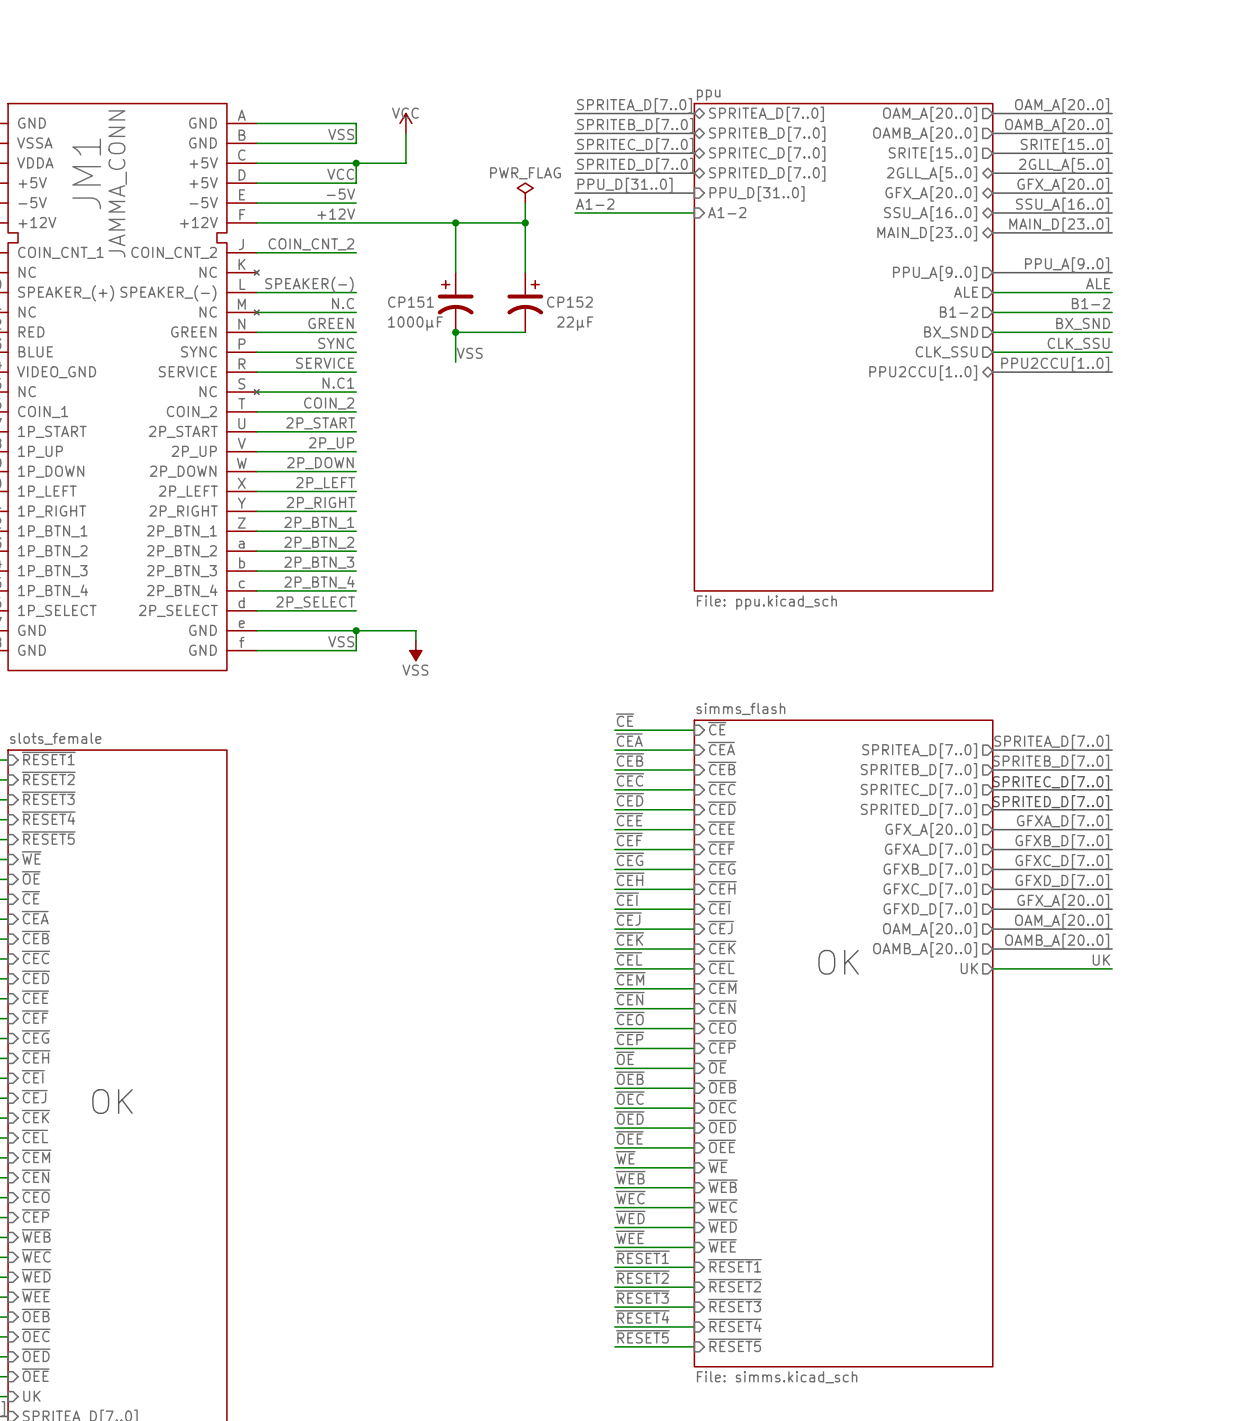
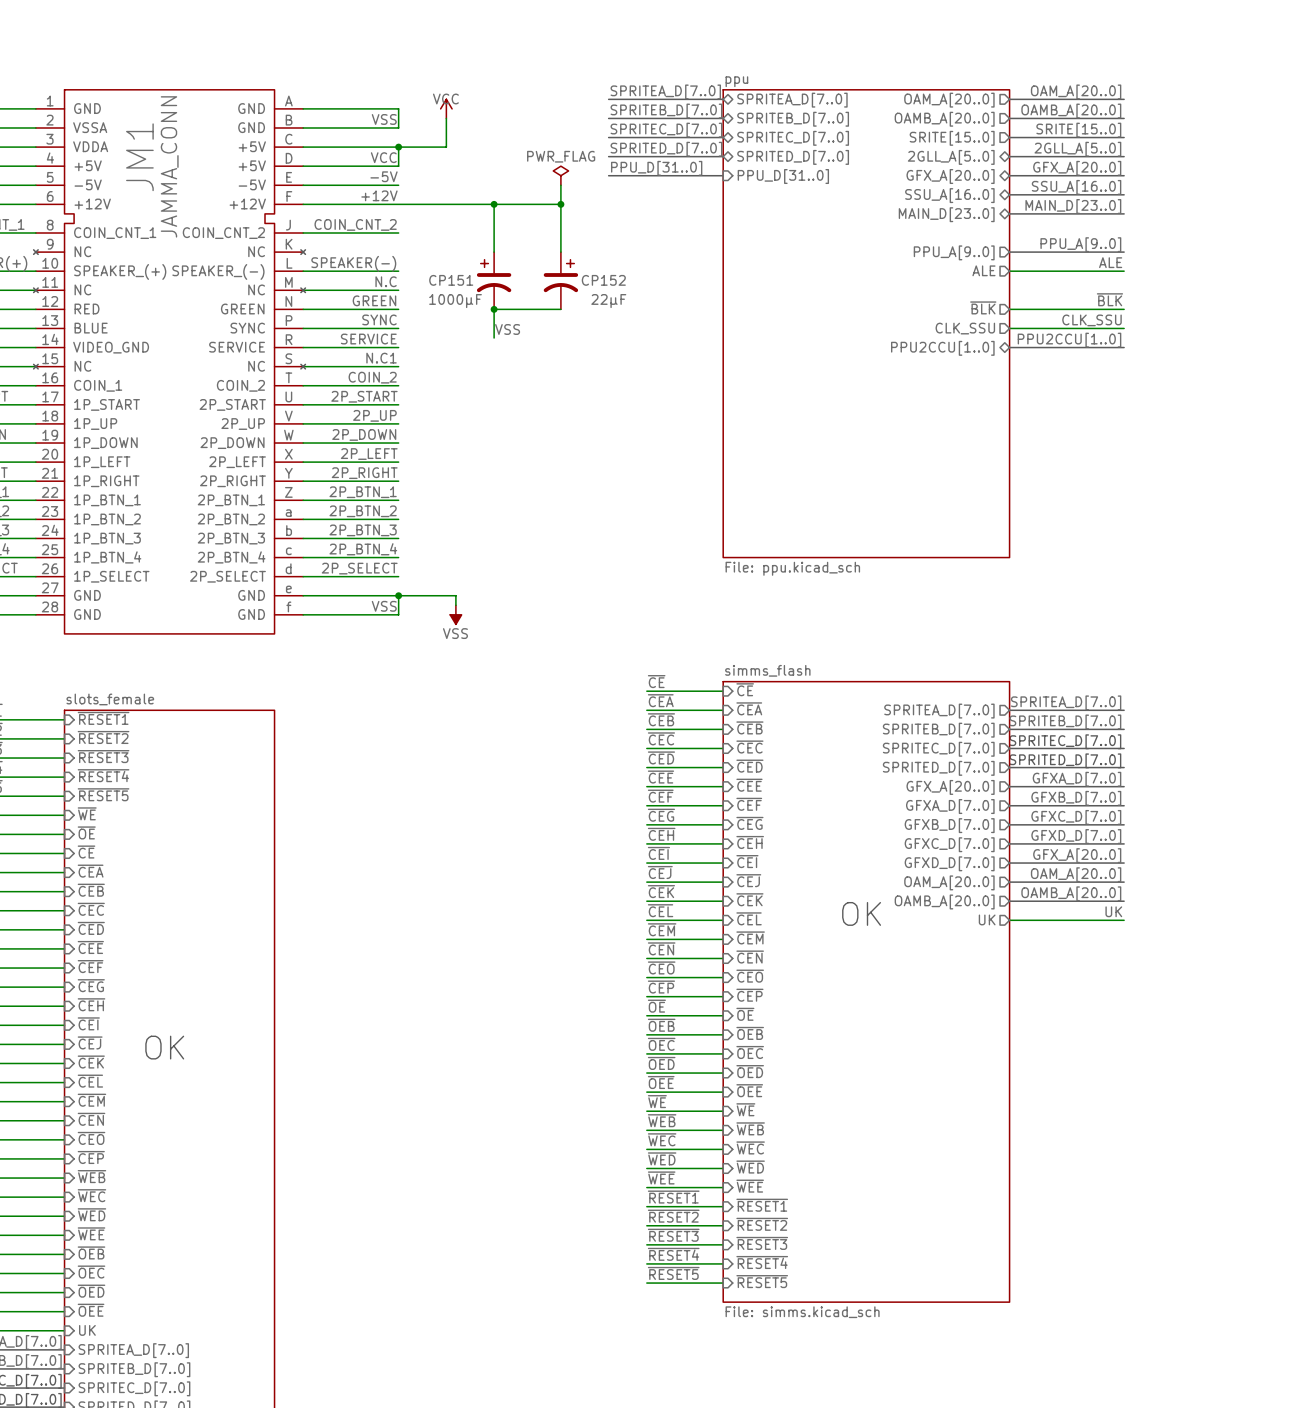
label: A1-2 (595, 204) -> none
wire: (575, 212) (694, 212) -> none
sheet pin: A1-2 (727, 212) -> none
label: B1-2 (1090, 303) -> none
sheet pin: B1-2 (958, 312) -> none
wire: (992, 312) (1112, 312) -> none
label: BX_SND (1083, 323) -> ~{BLK} (1109, 299)
sheet pin: BX_SND (951, 332) -> ~{BLK} (983, 307)

